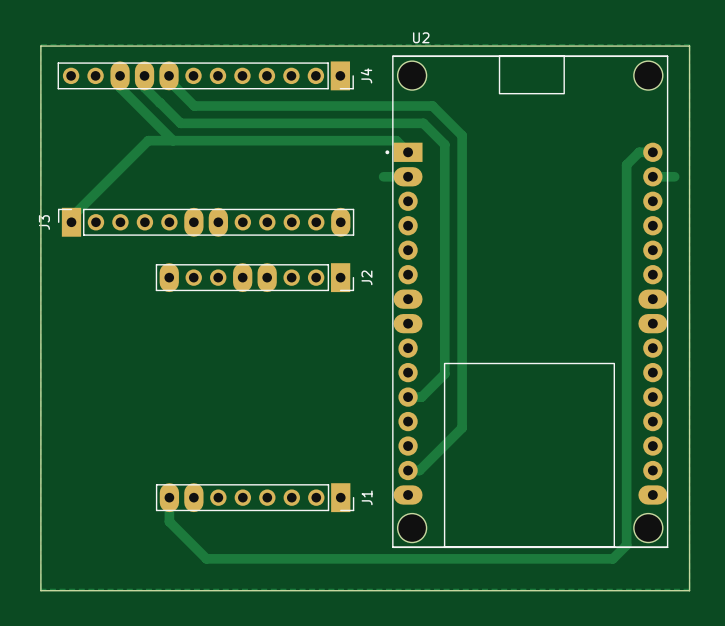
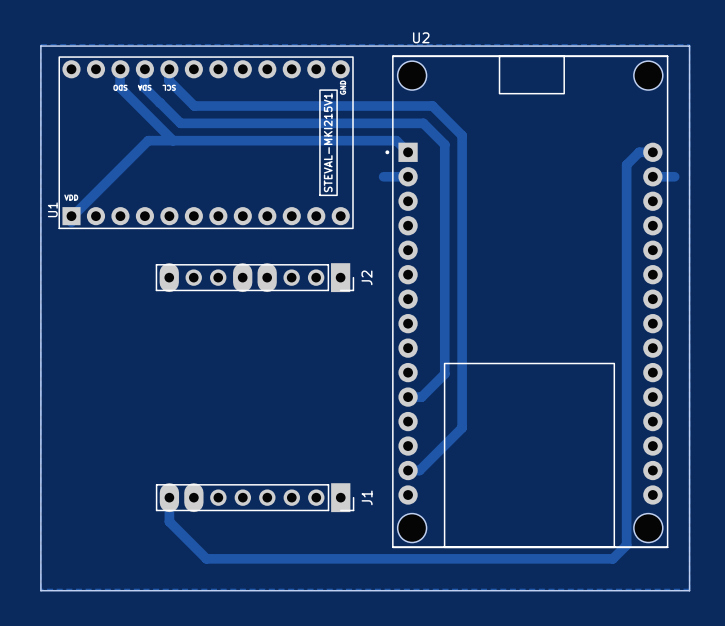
U2 footprint: [385, 55, 669, 548] -> [385, 55, 669, 548]
J4: (205, 75) -> none
U1: none -> (206, 142)
J3: (206, 222) -> none

